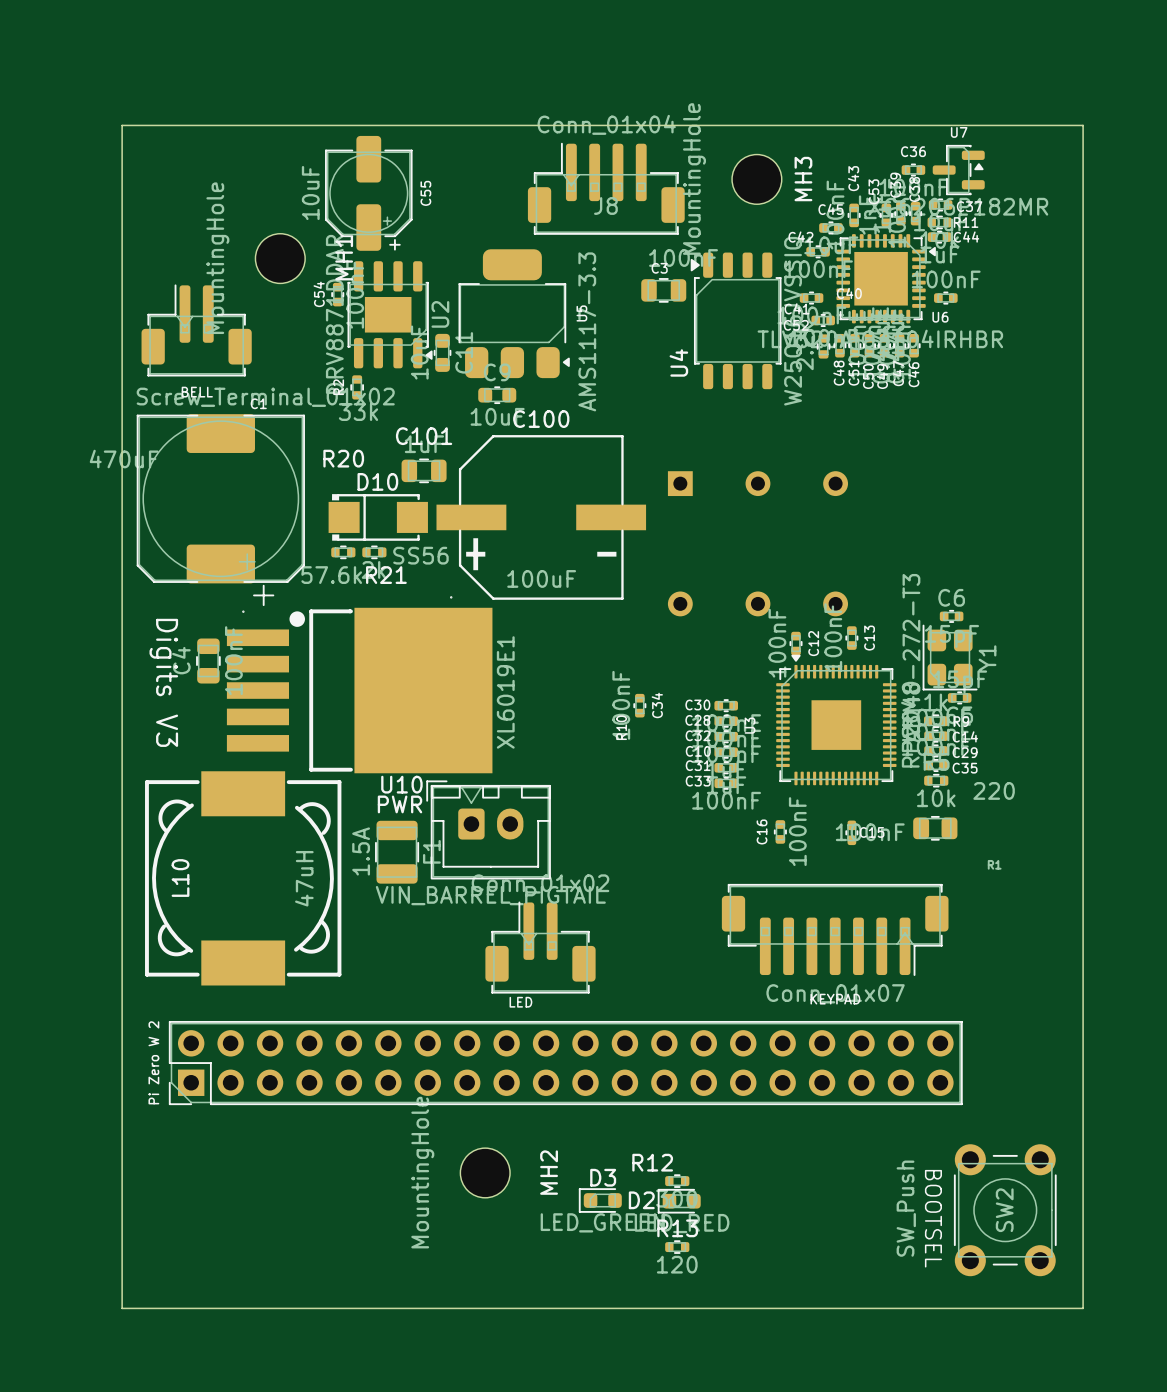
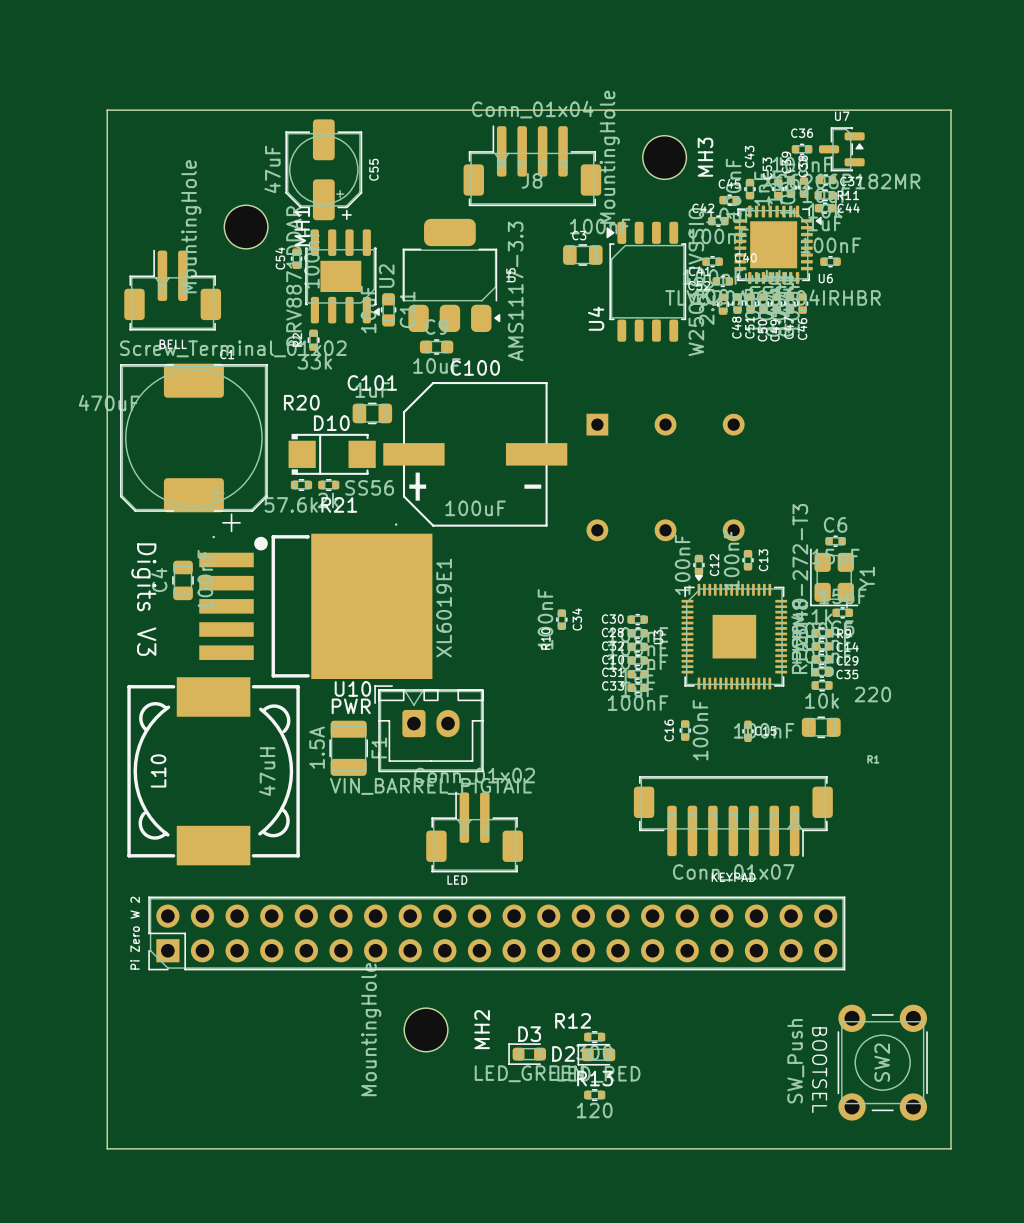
C55 value: 10uF (310, 193) -> 47uF (272, 169)

